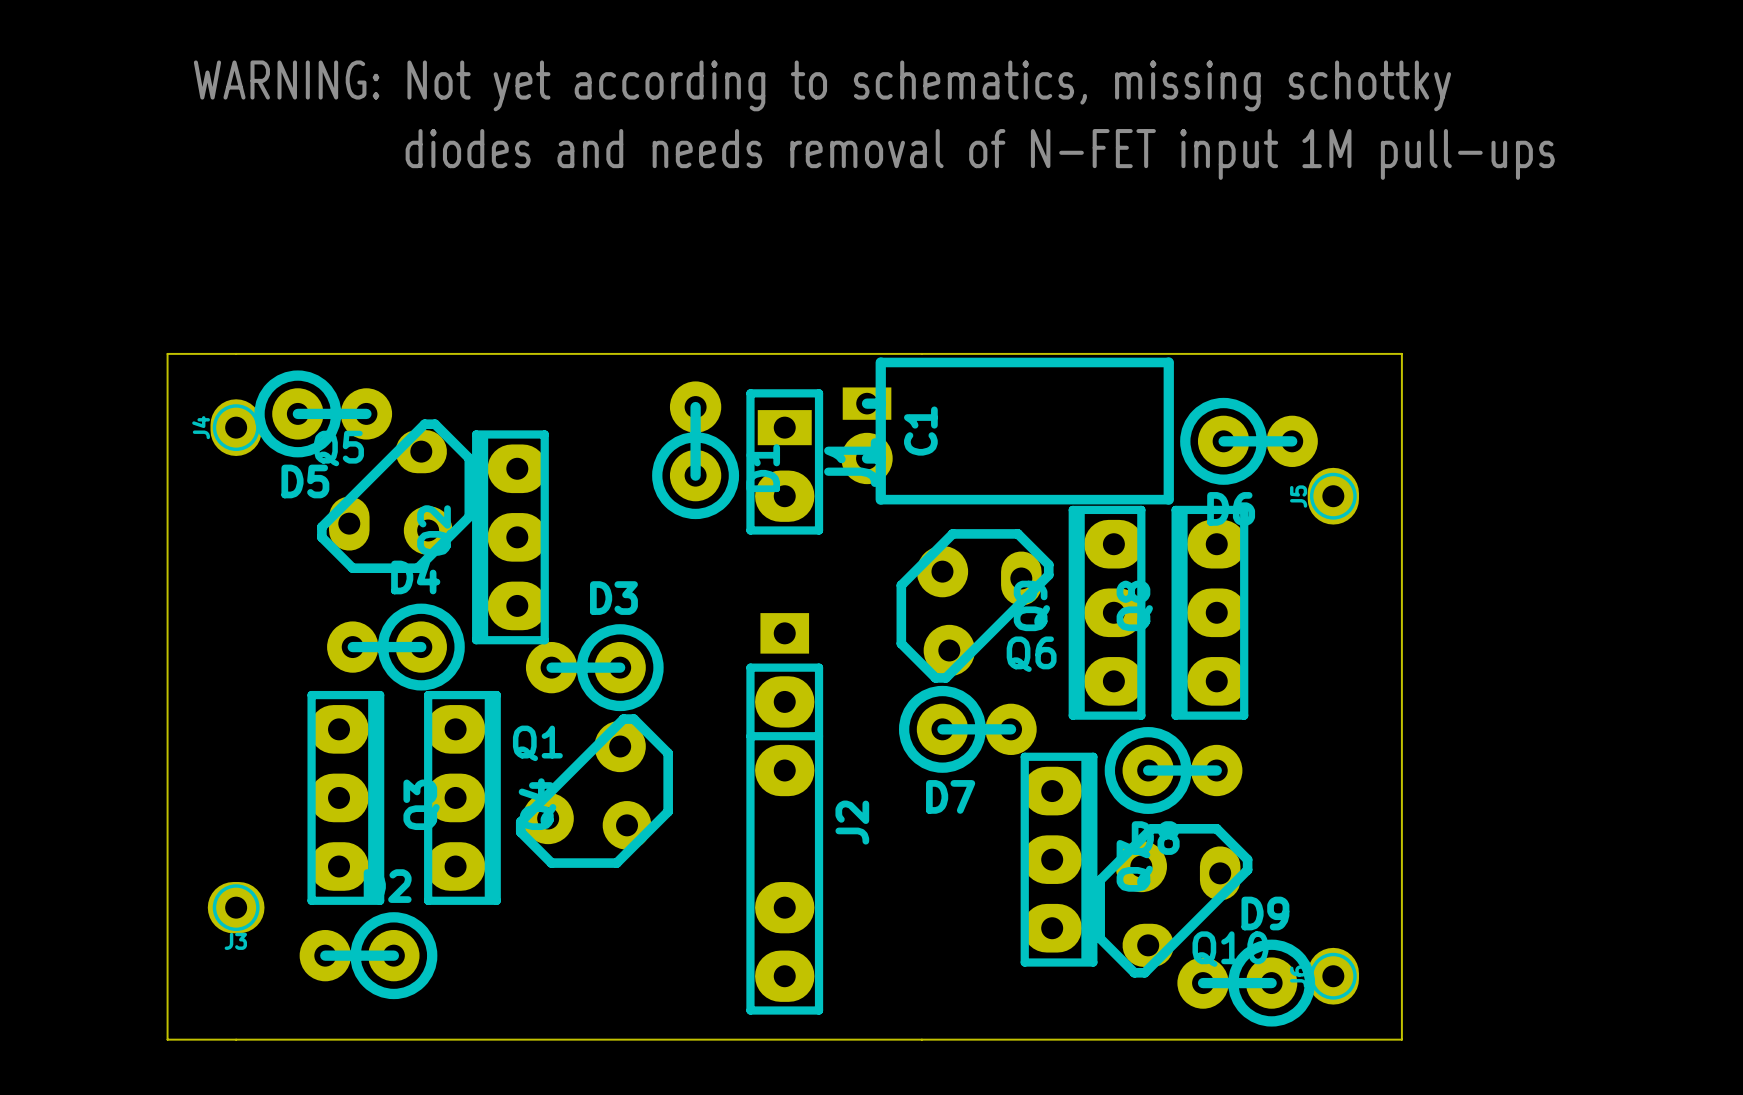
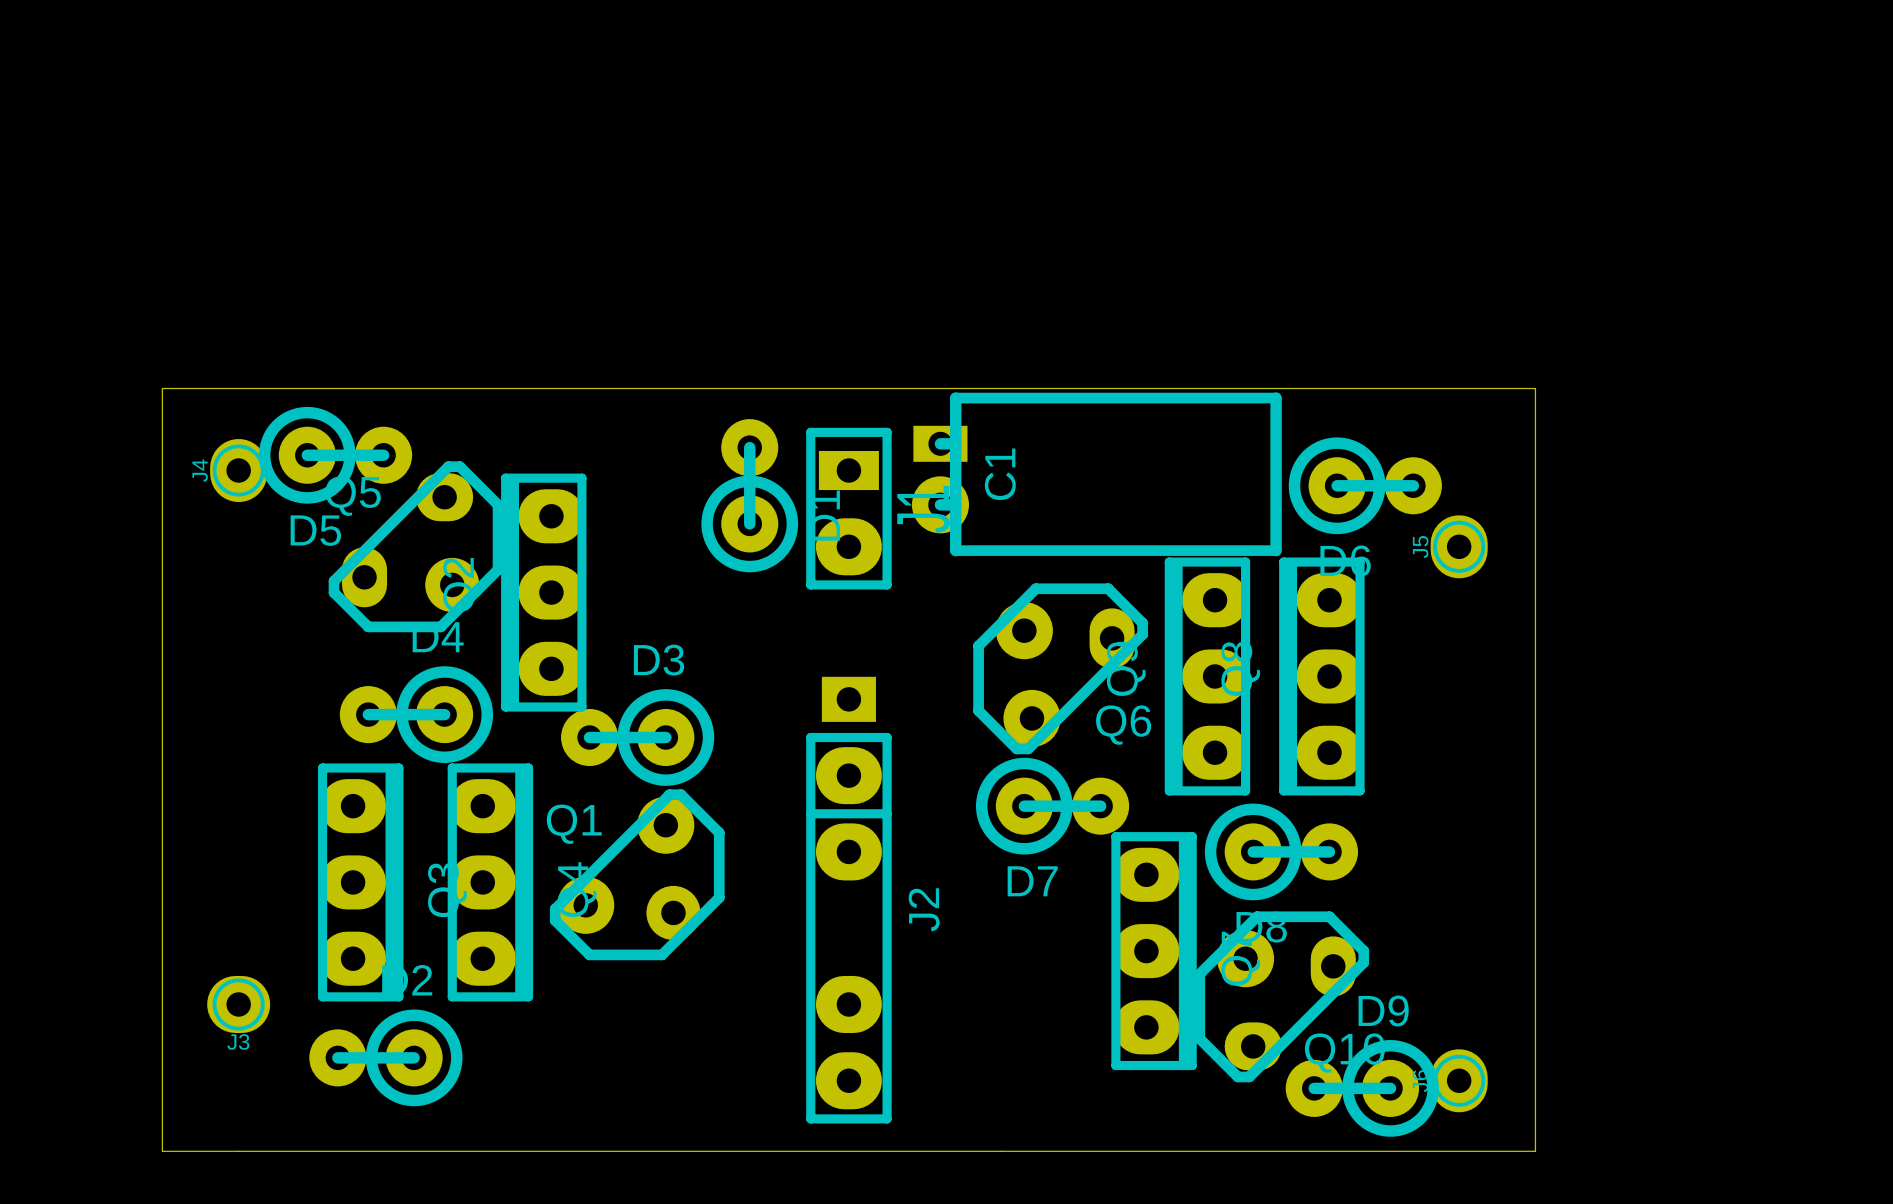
text: WARNING: Not yet according to schematics, missing schottky (822, 85) -> none
text: diodes and needs removal of N-FET input 1M pull-ups (980, 154) -> none

